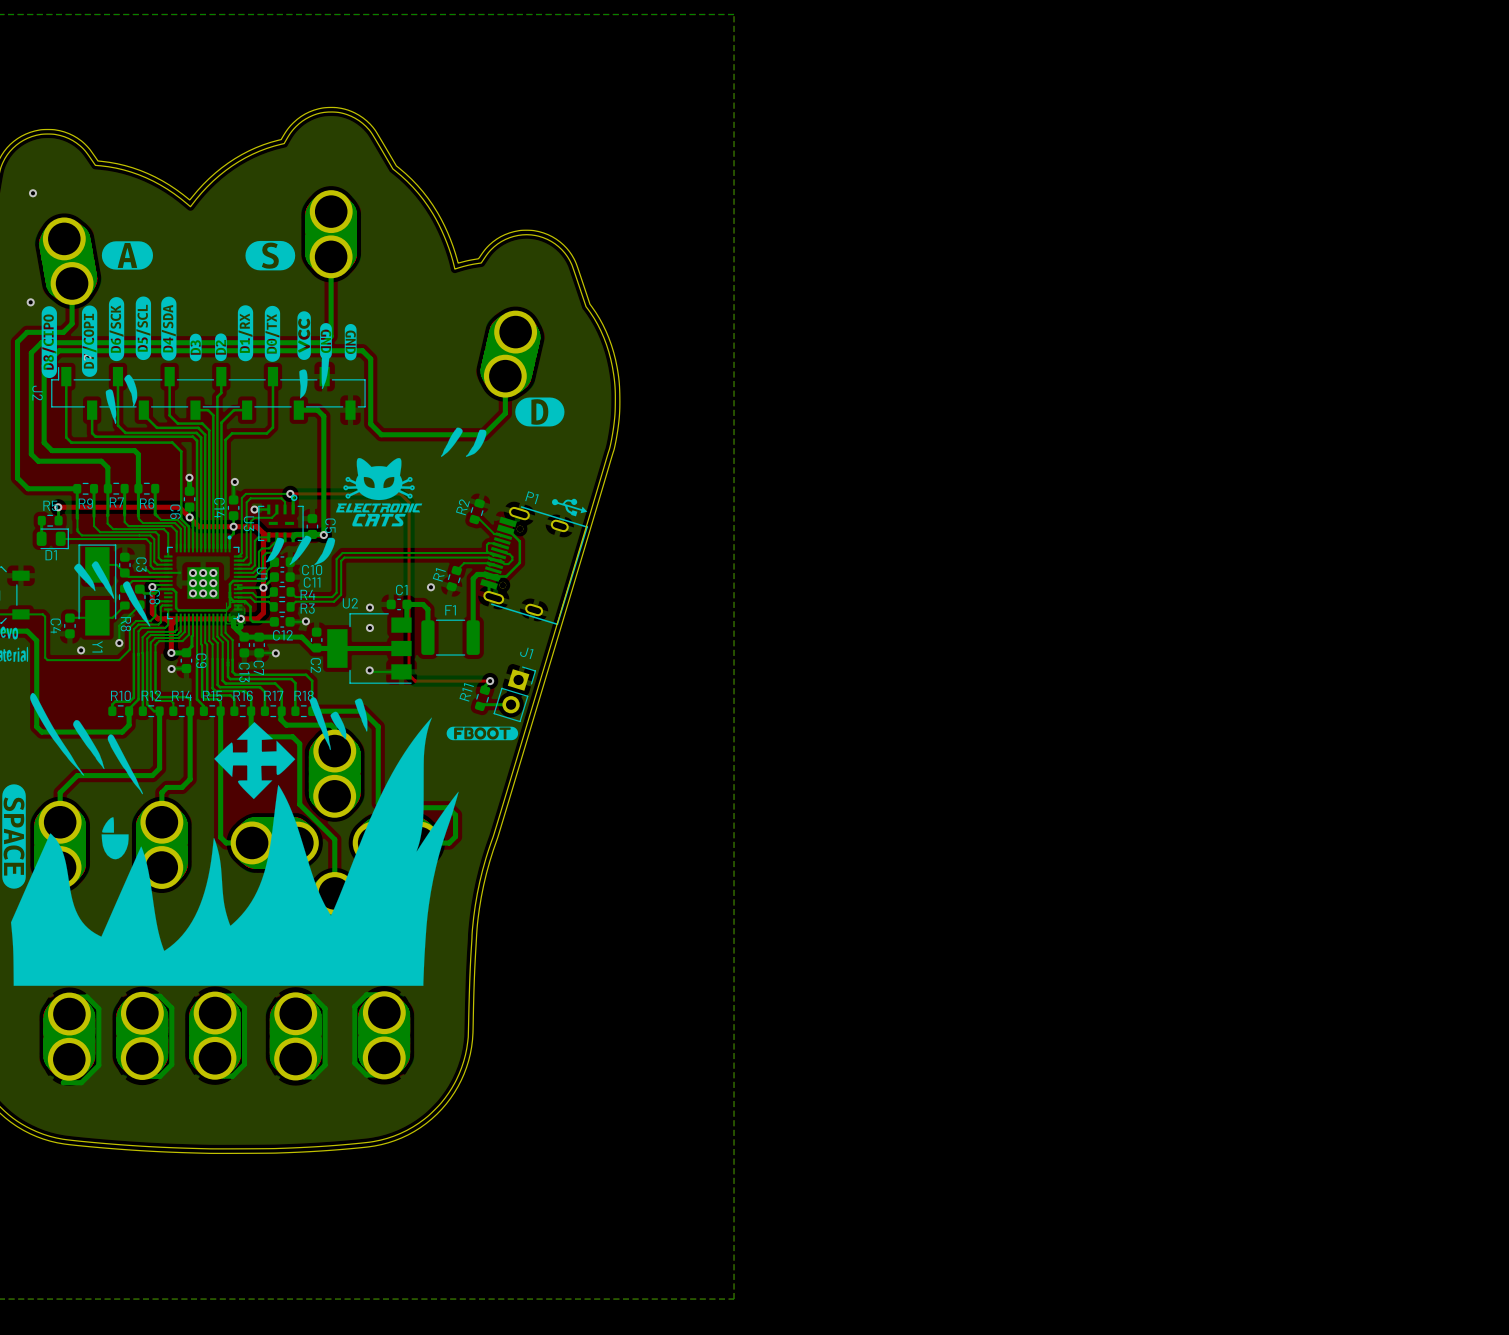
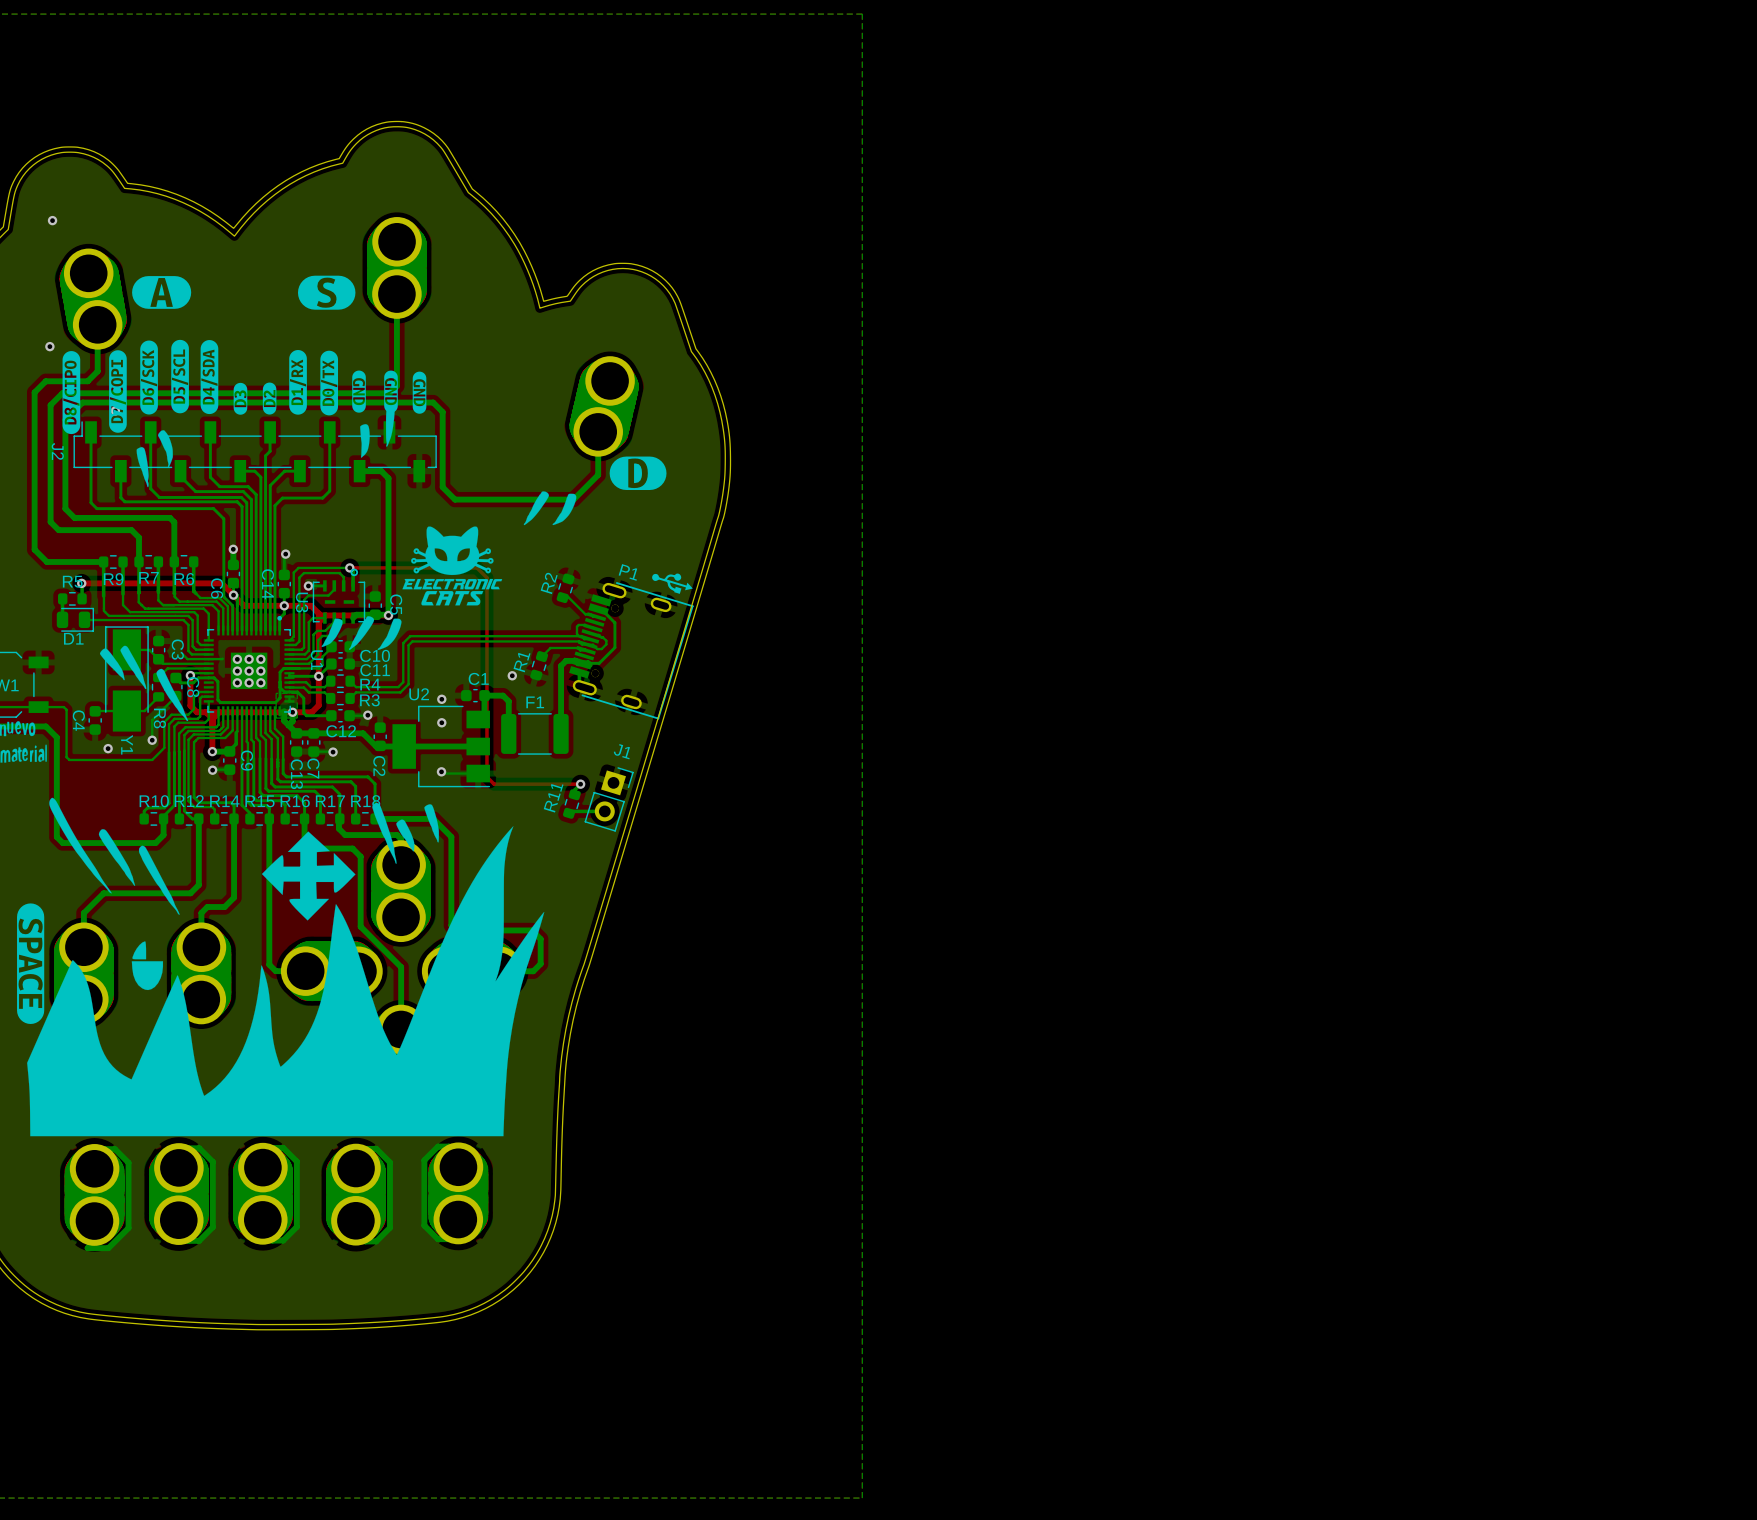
drawing shape: [297, 311, 311, 360] -> [352, 370, 366, 413]
drawing: [446, 726, 519, 741] -> none

